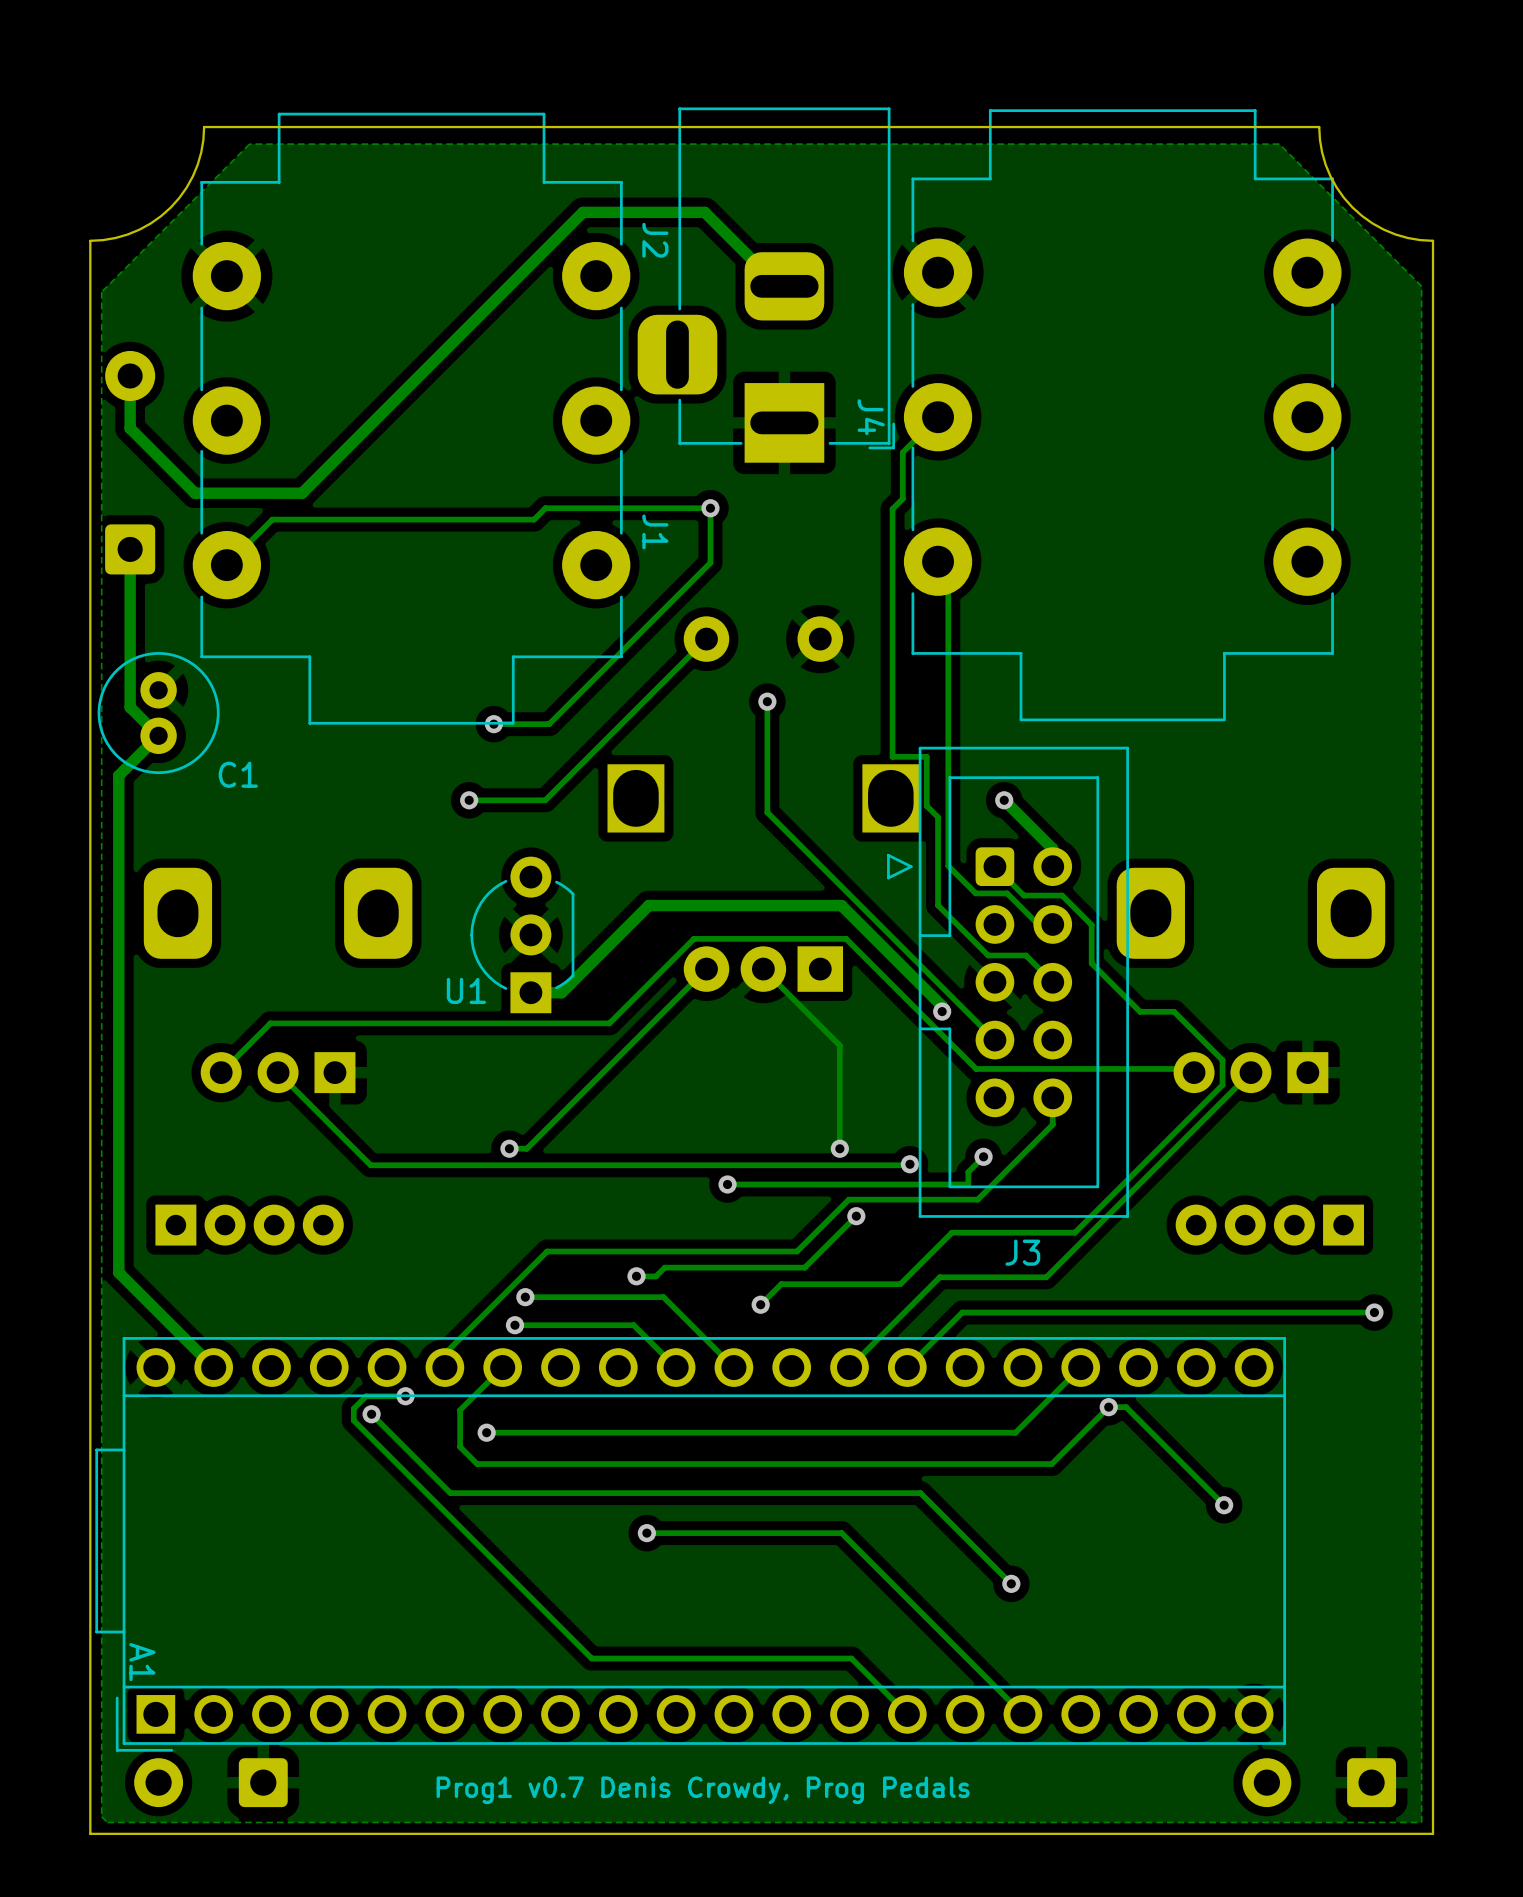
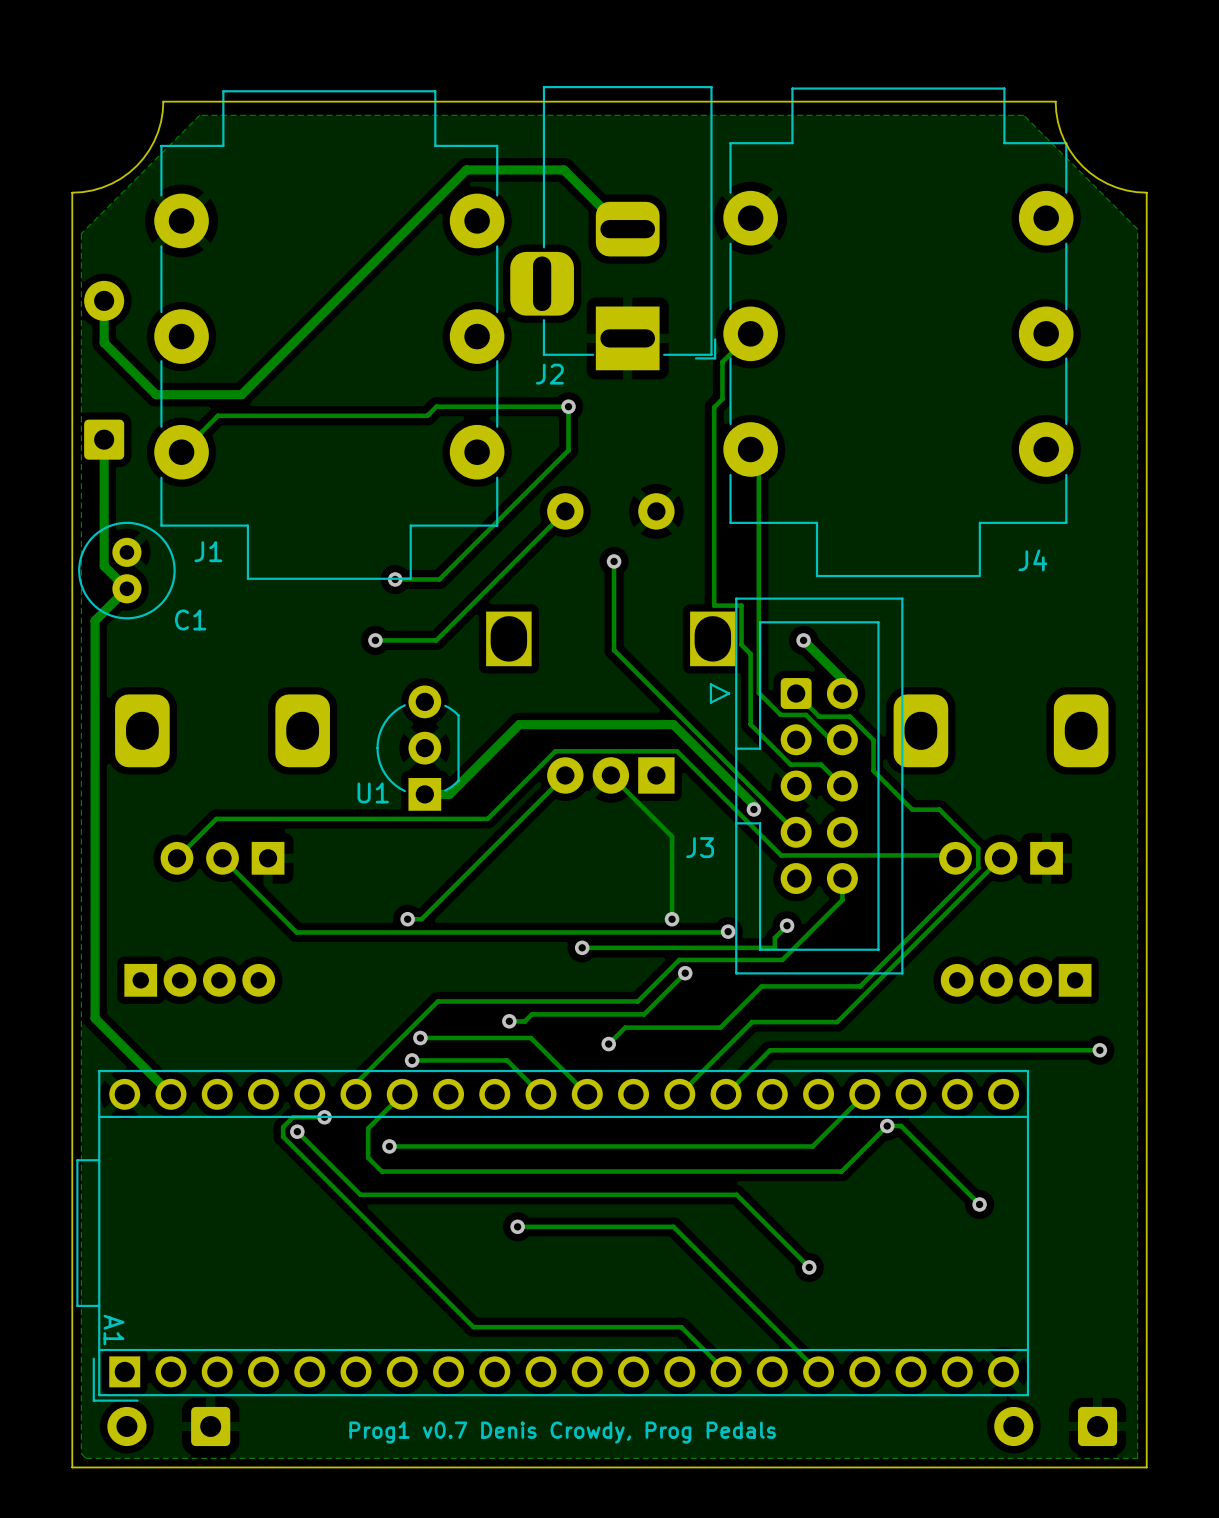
J2 name rotation: 0° (655, 240) -> 90° counterclockwise (549, 374)
J2 name position: J2 (655, 240) -> J2 (549, 374)
J4 name rotation: 0° (871, 417) -> 90° counterclockwise (1032, 560)
J4 name position: J4 (871, 417) -> J4 (1032, 560)
J1 name rotation: 0° (655, 531) -> 90° counterclockwise (208, 551)
J1 name position: J1 (655, 531) -> J1 (208, 551)
J3 name position: J3 (1022, 1252) -> J3 (700, 847)

